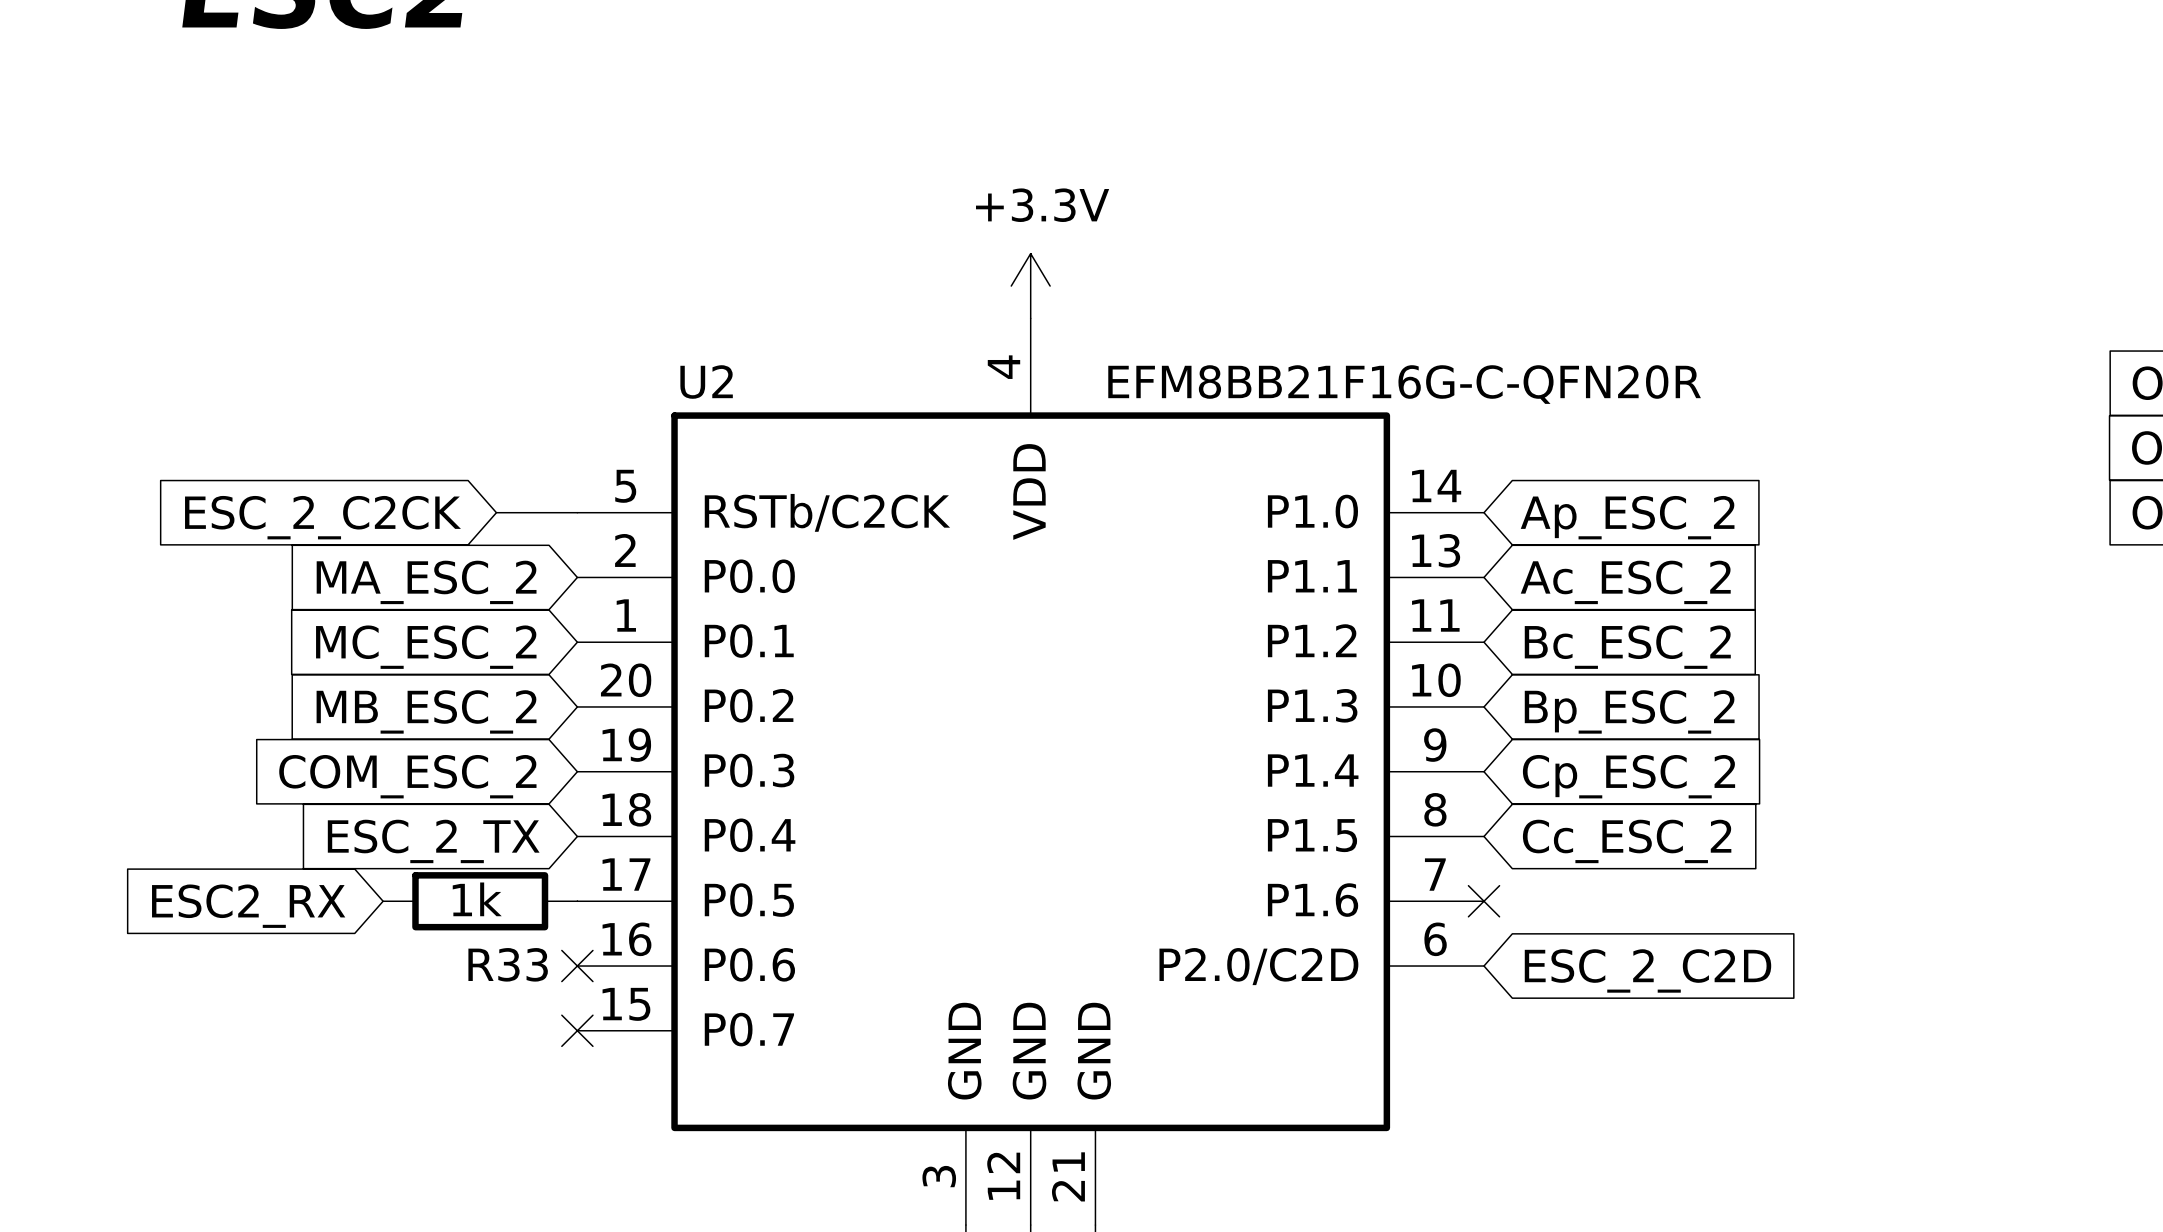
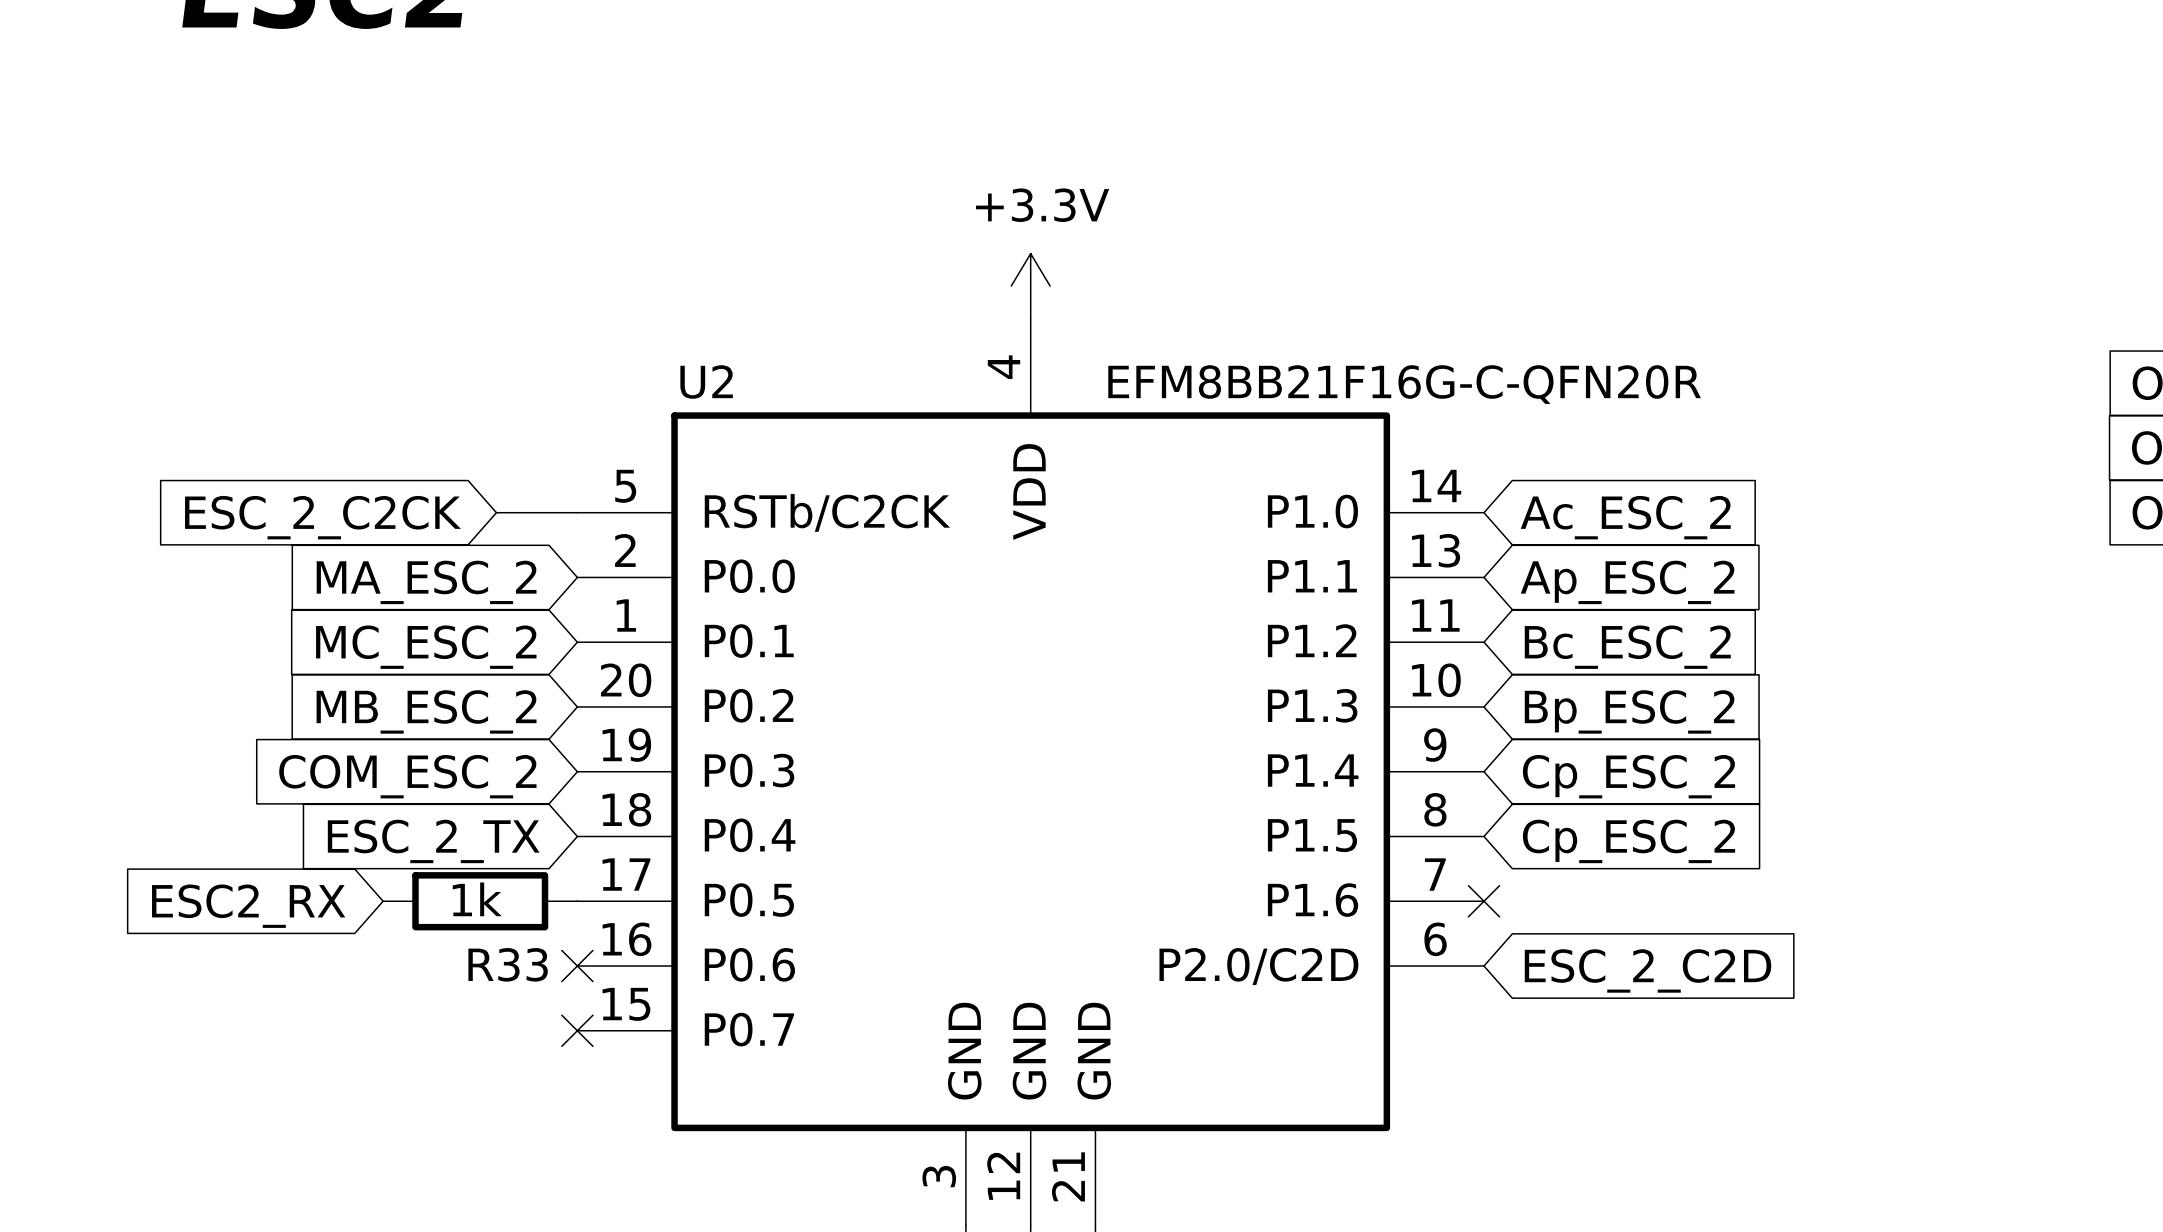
global label: Ap_ESC_2 (1627, 517) -> Ac_ESC_2 (1625, 517)
global label: Ac_ESC_2 (1625, 582) -> Ap_ESC_2 (1627, 582)
global label: Cc_ESC_2 (1627, 841) -> Cp_ESC_2 (1629, 841)

